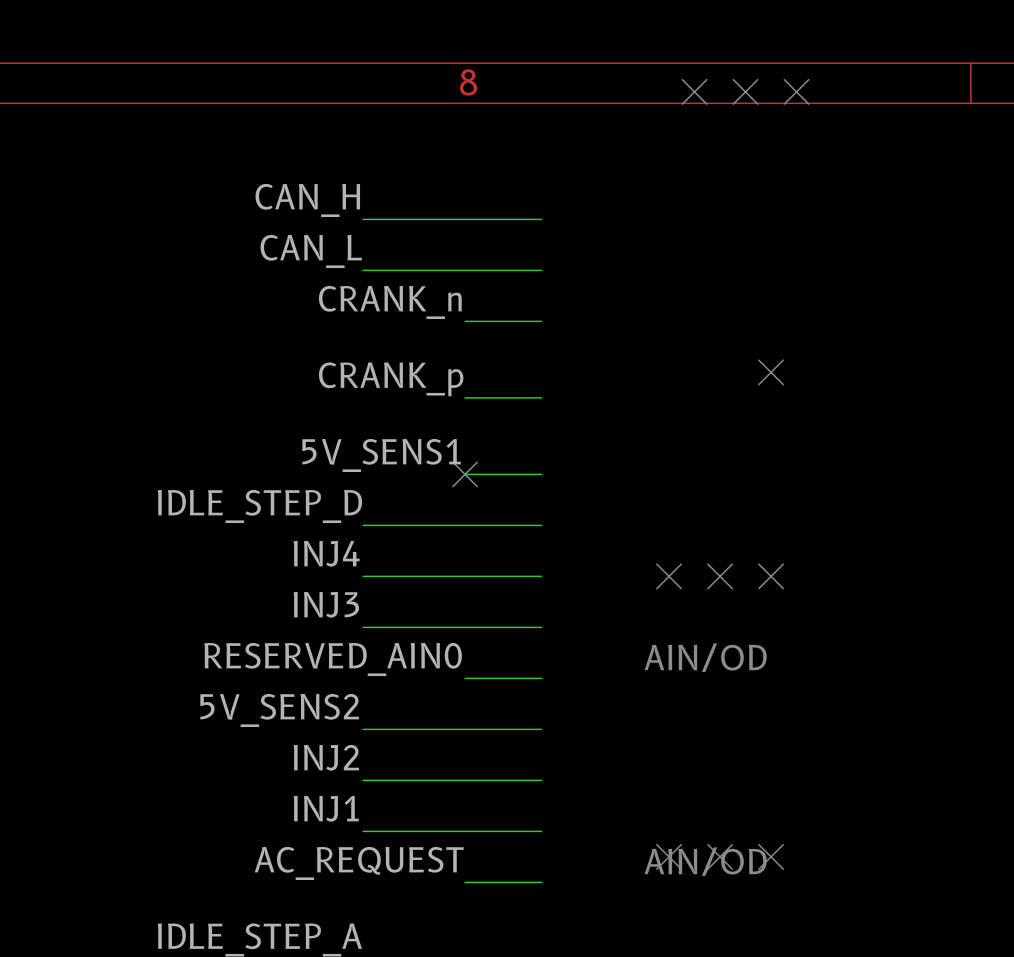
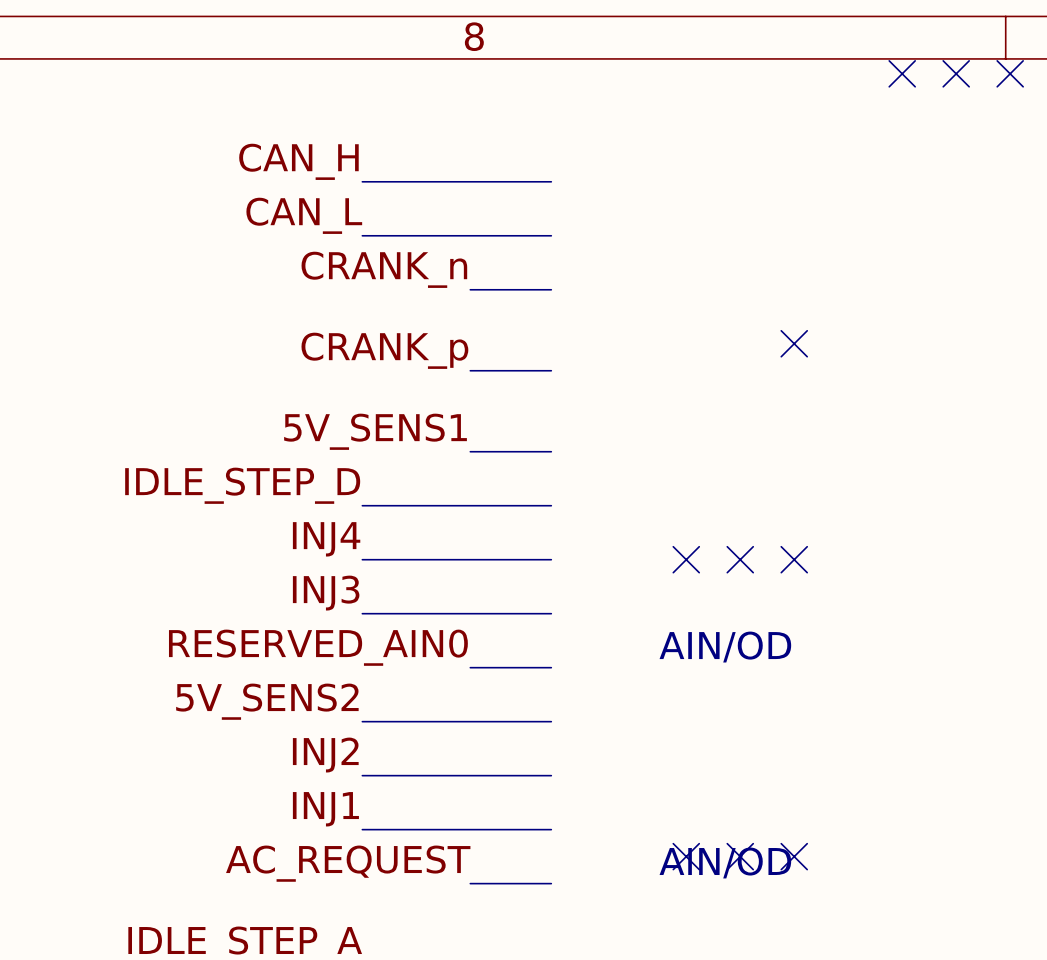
no-connect mark: (694, 91) -> none
no-connect mark: (745, 91) -> none
no-connect mark: (796, 91) -> none
no-connect mark: none -> (902, 73)
no-connect mark: none -> (956, 73)
no-connect mark: none -> (1010, 73)
no-connect mark: (465, 474) -> none

